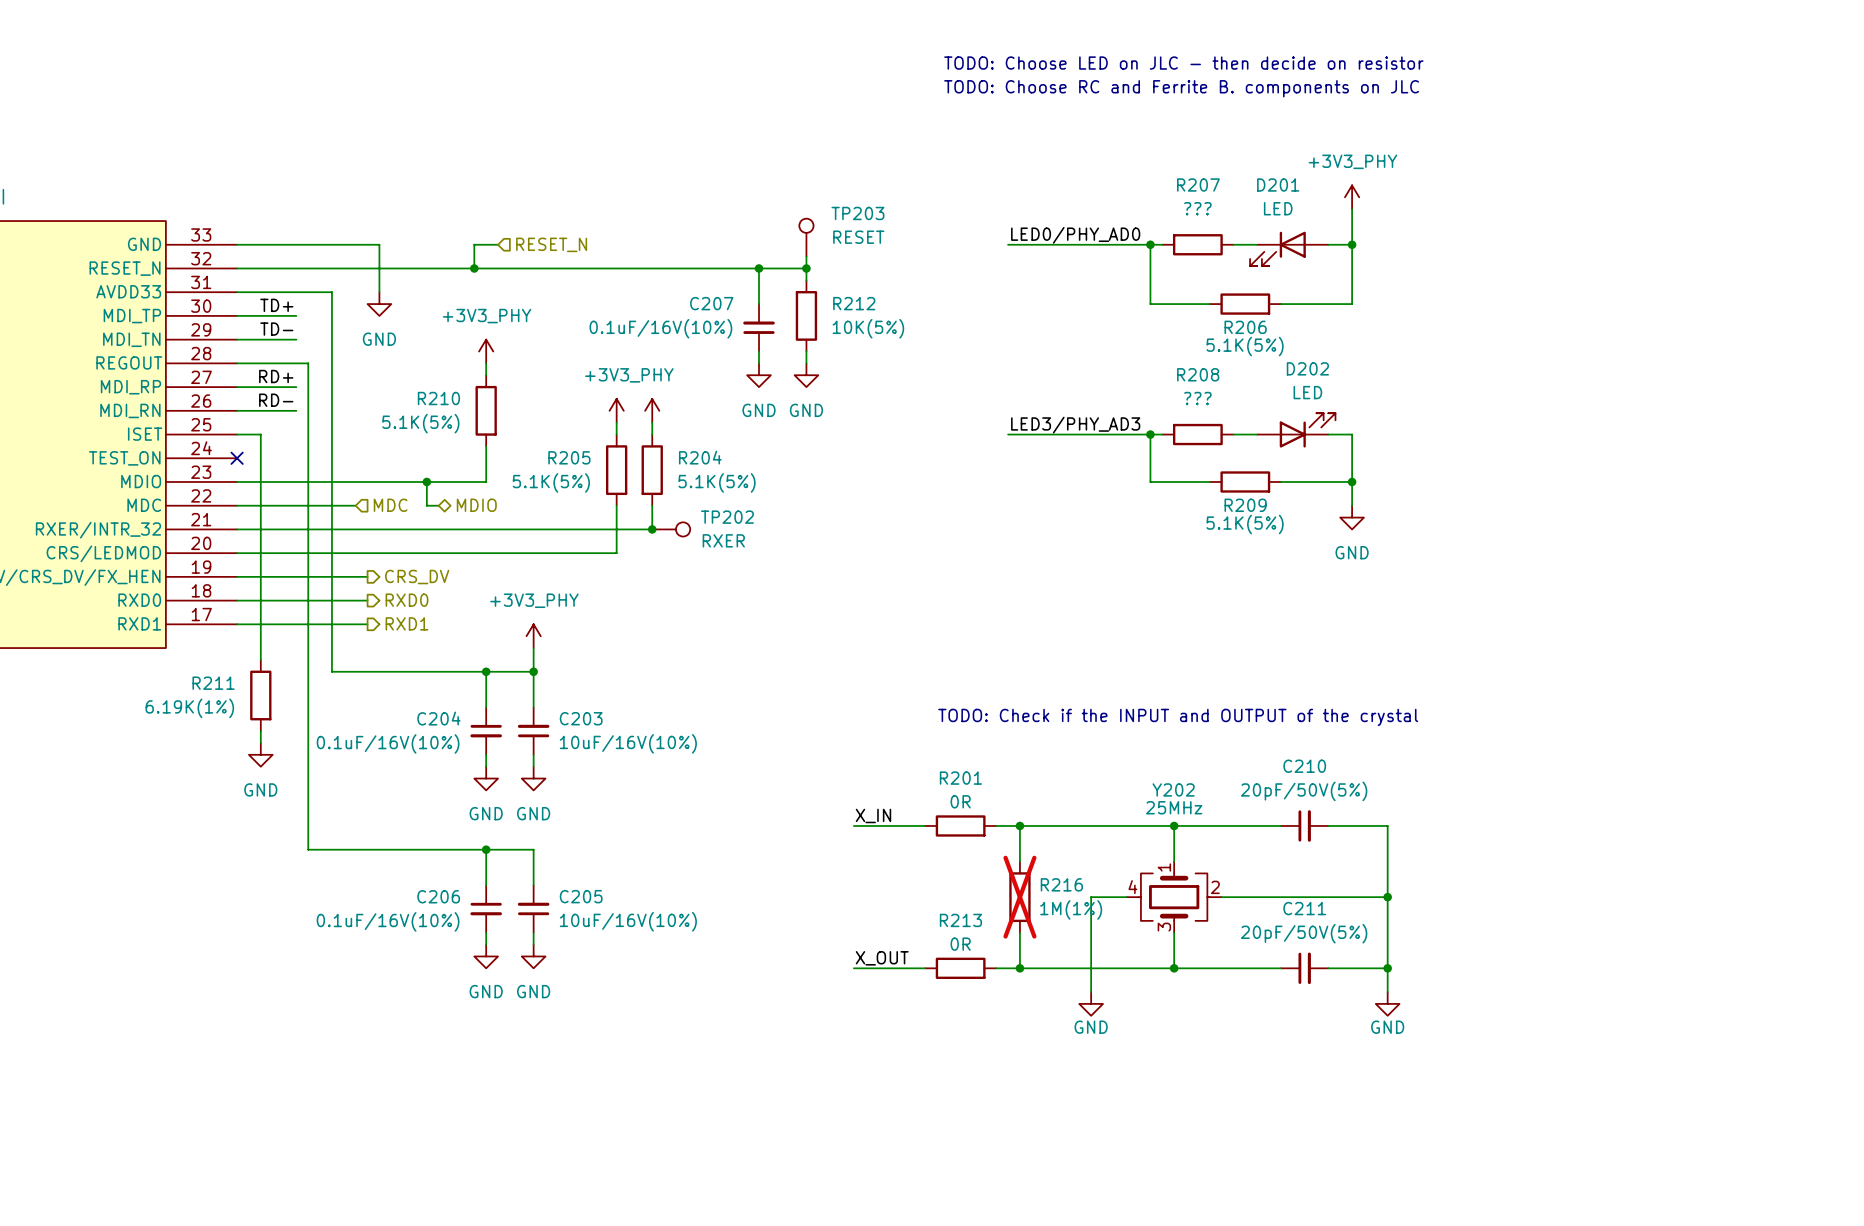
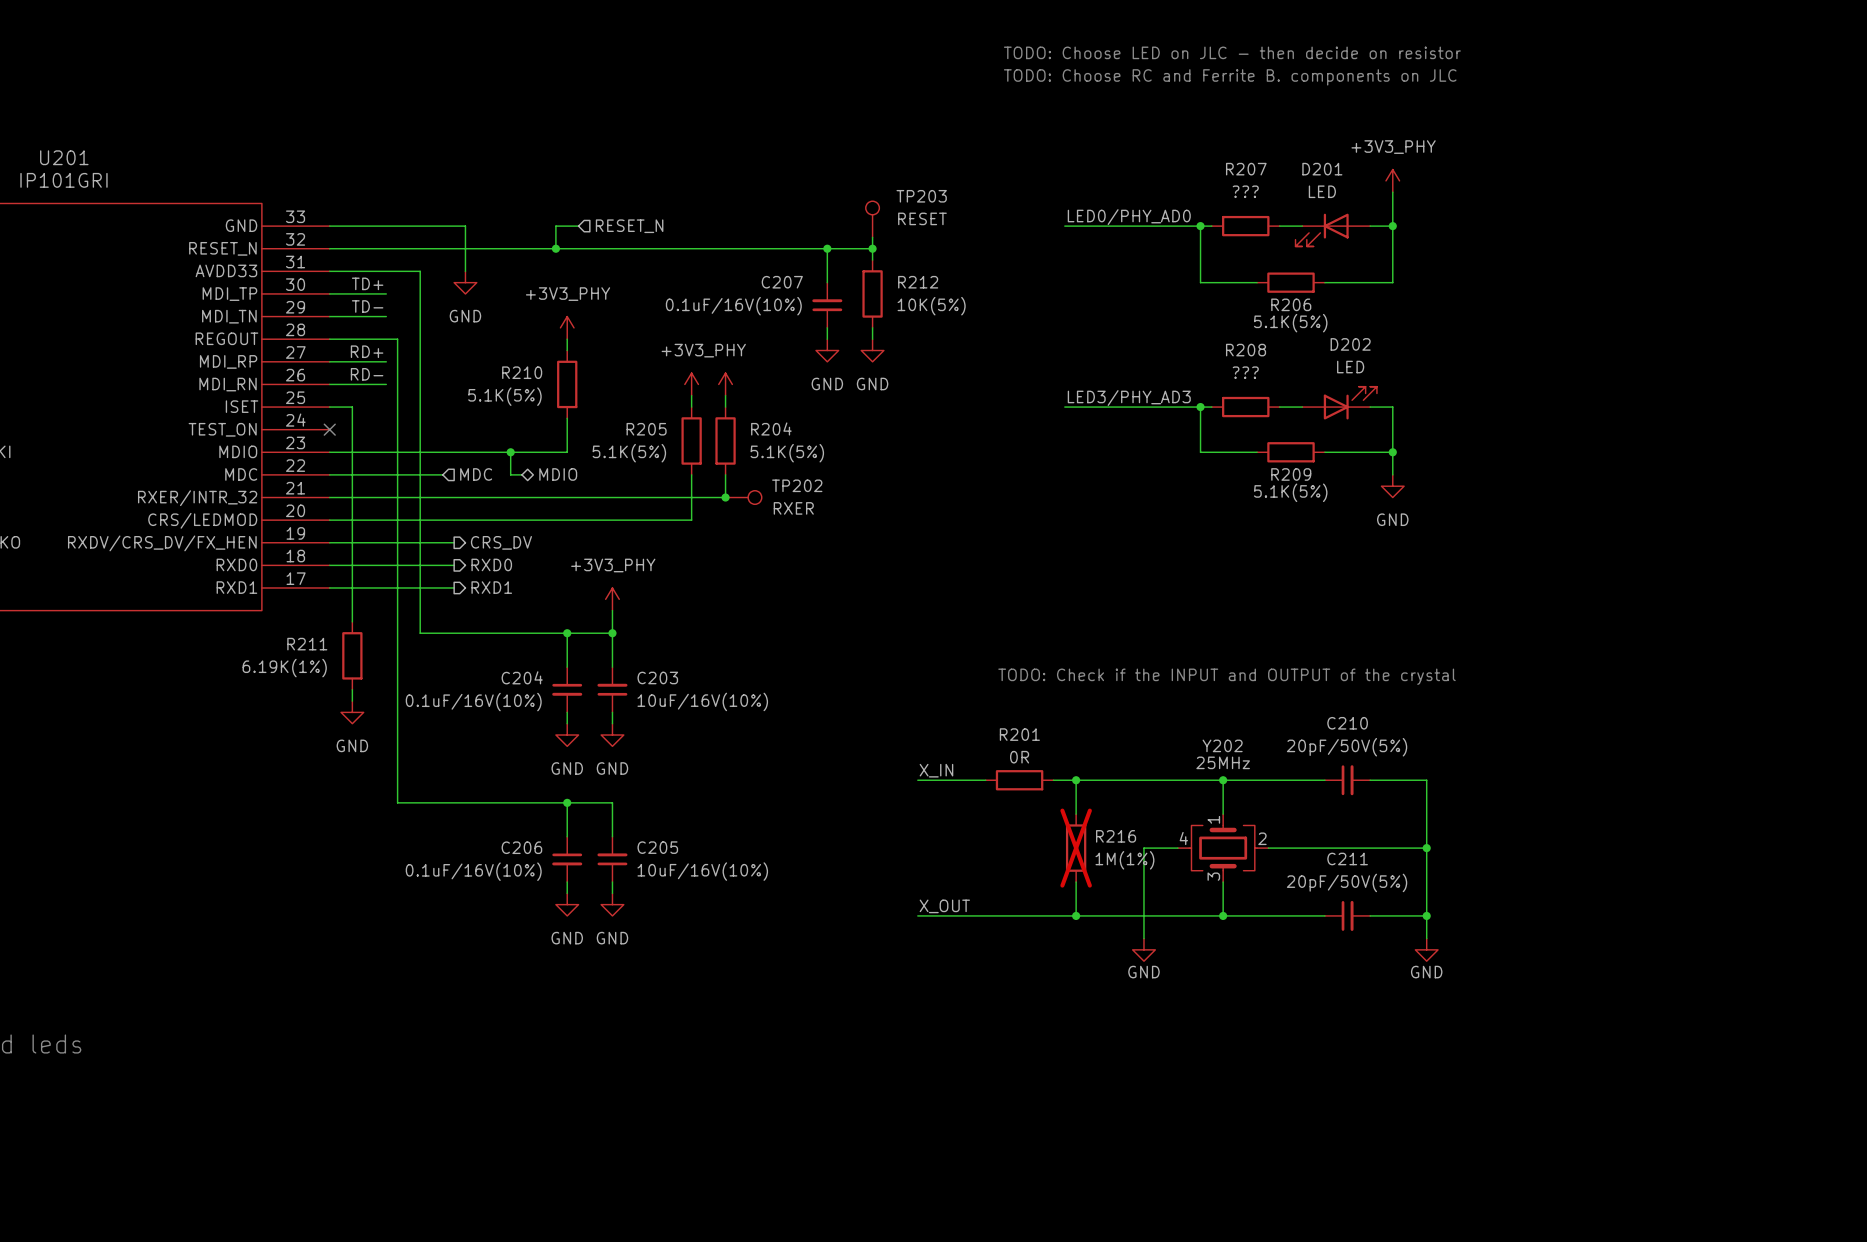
wire: none -> (985, 915) (1053, 915)
R213: 0R (960, 968) -> none

